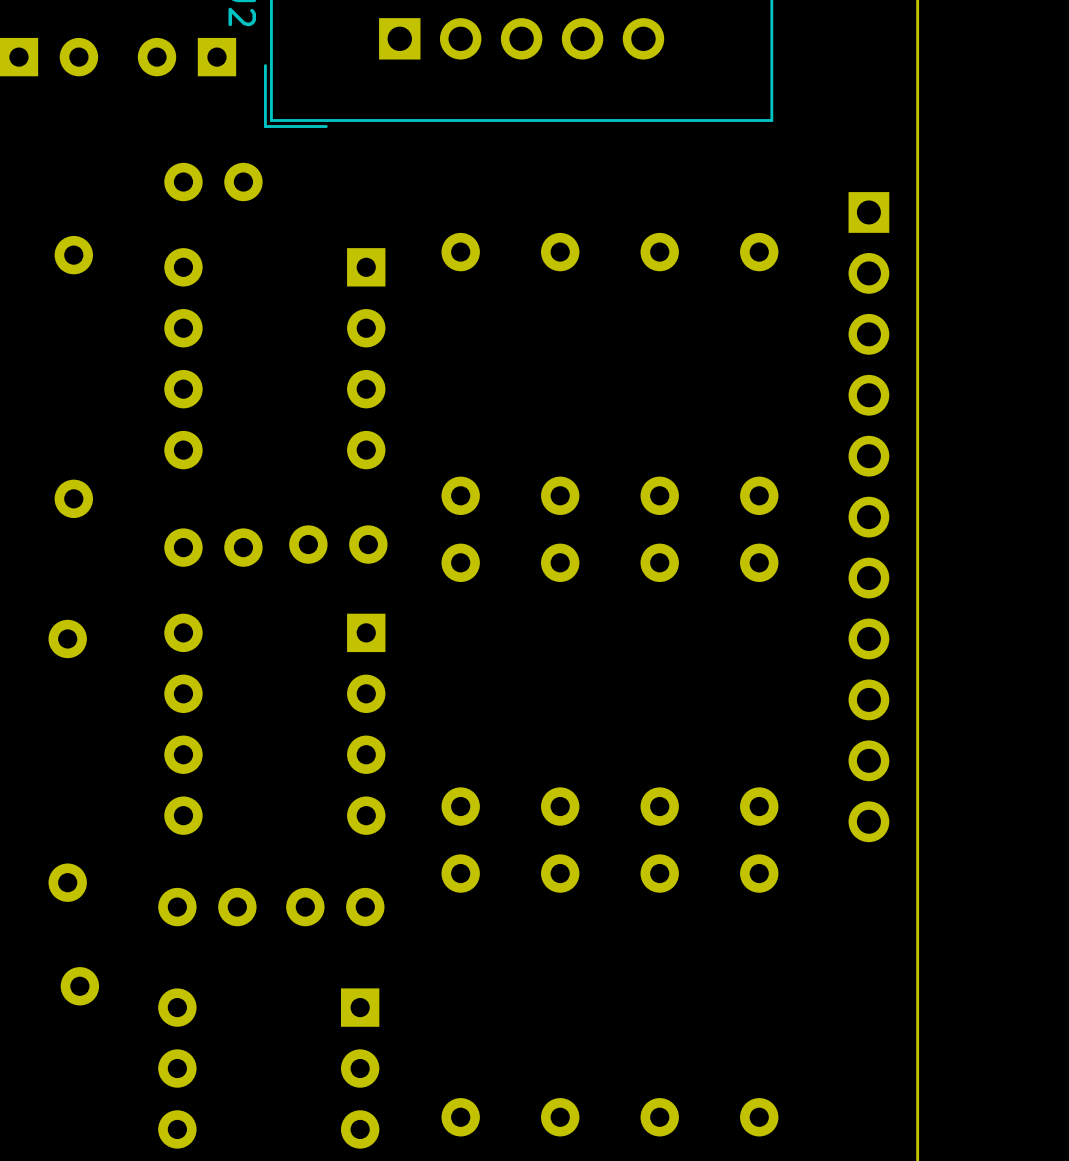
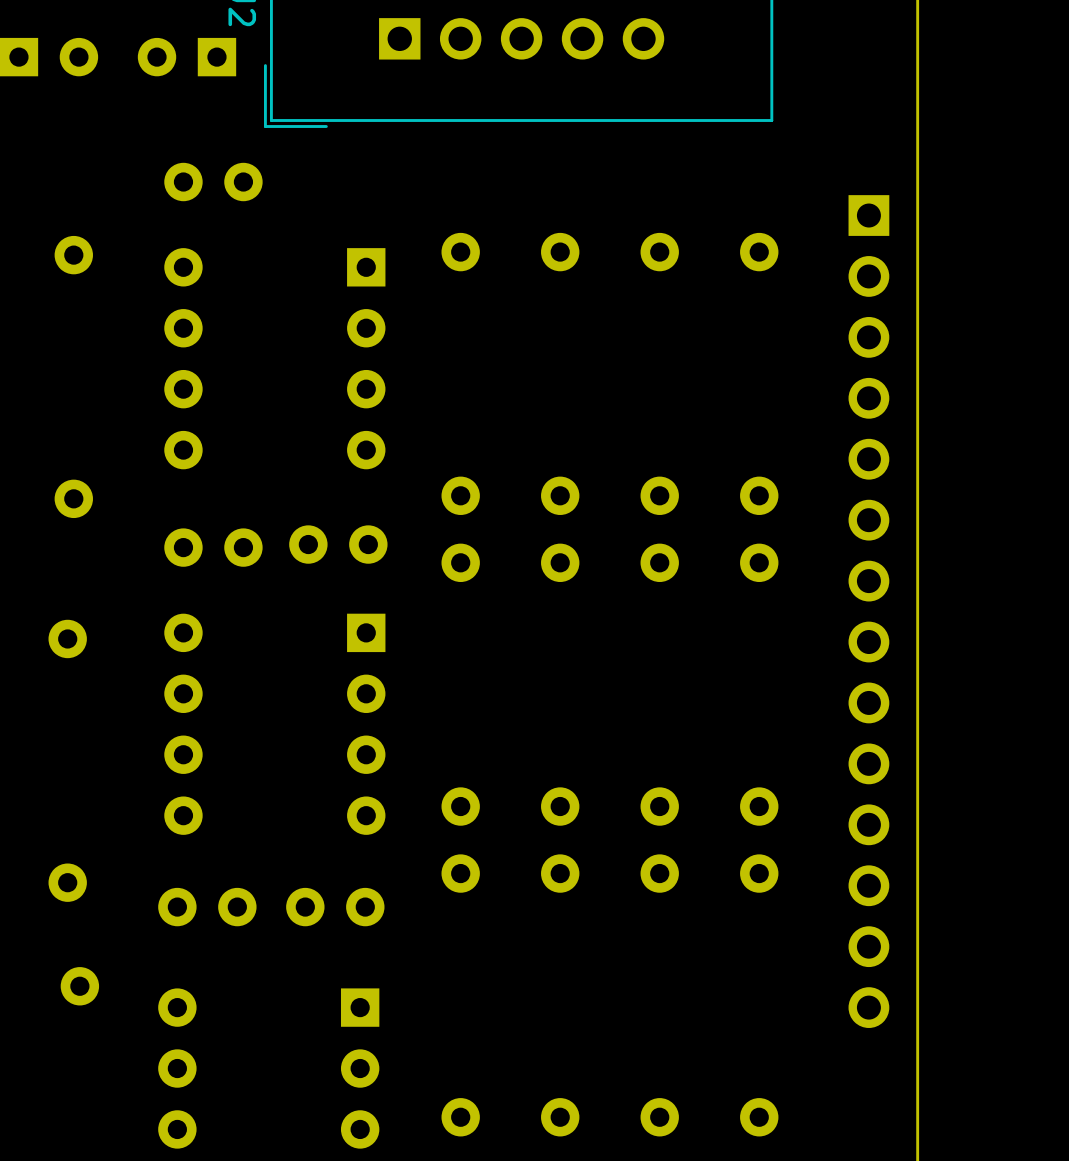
part: (868, 517) -> none
part: none -> (868, 611)

